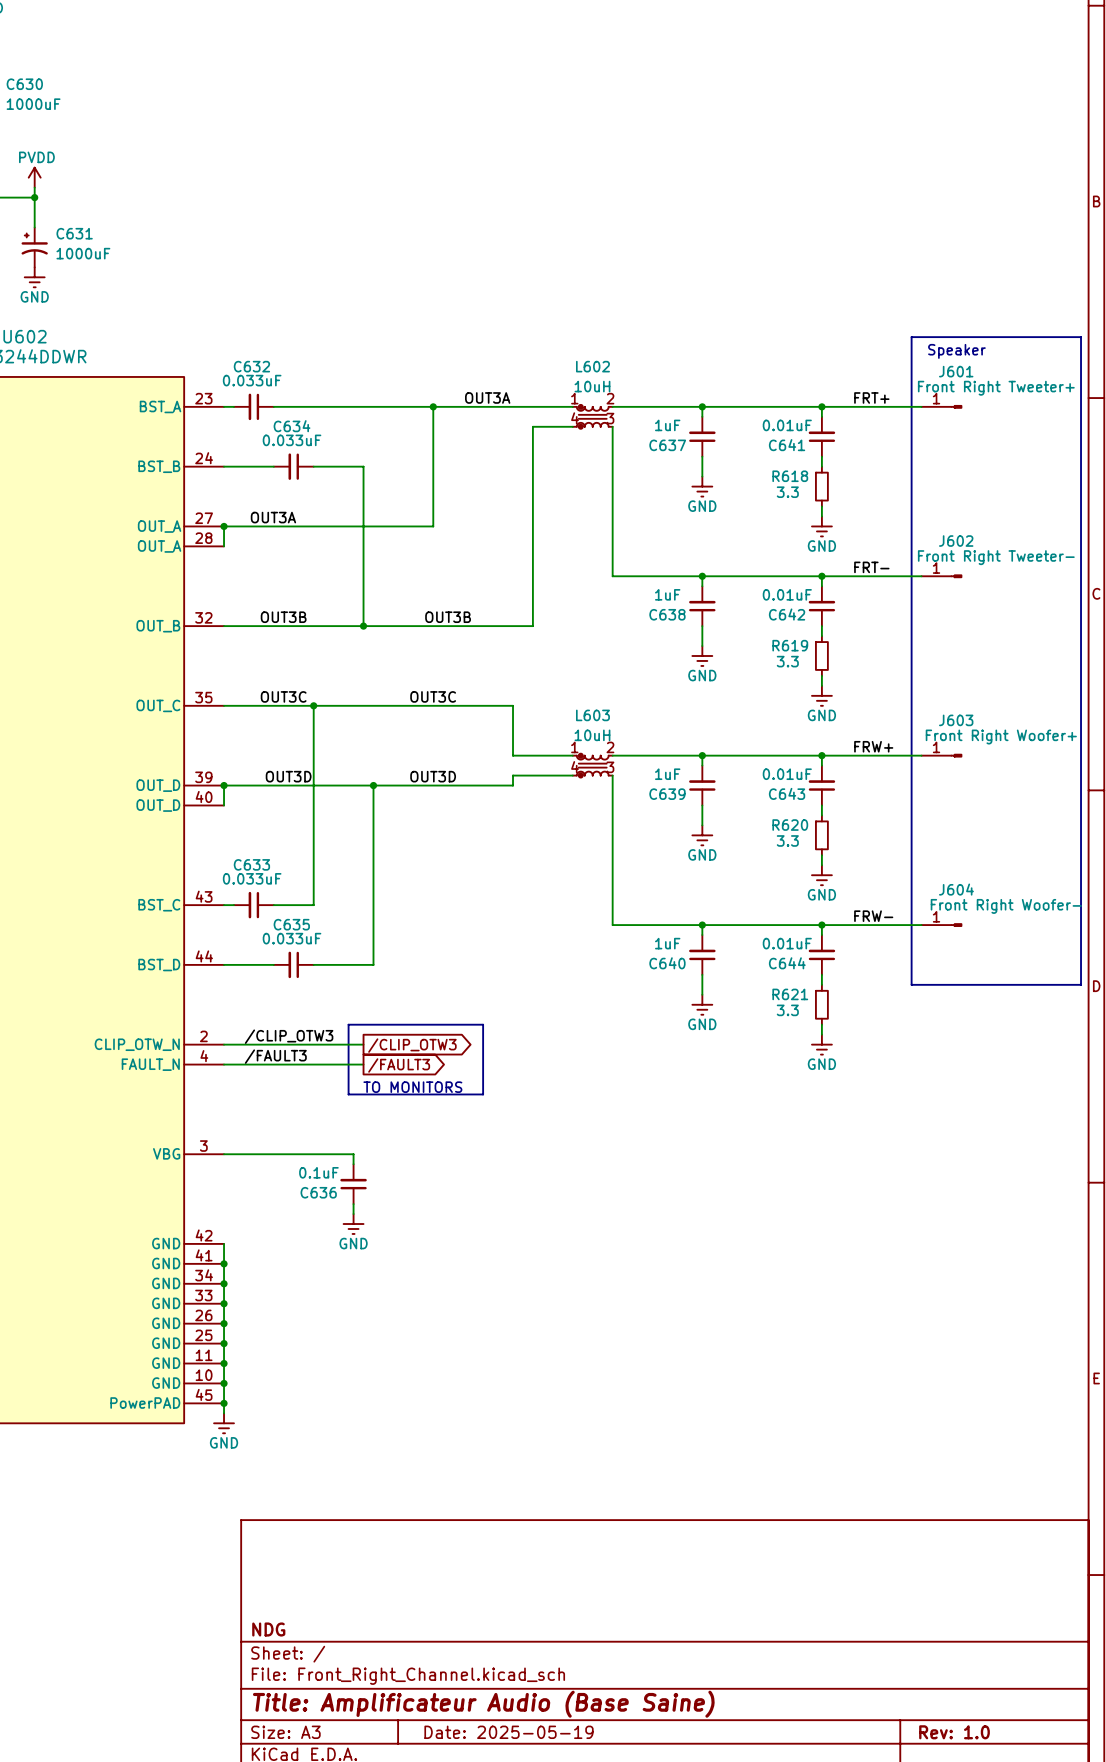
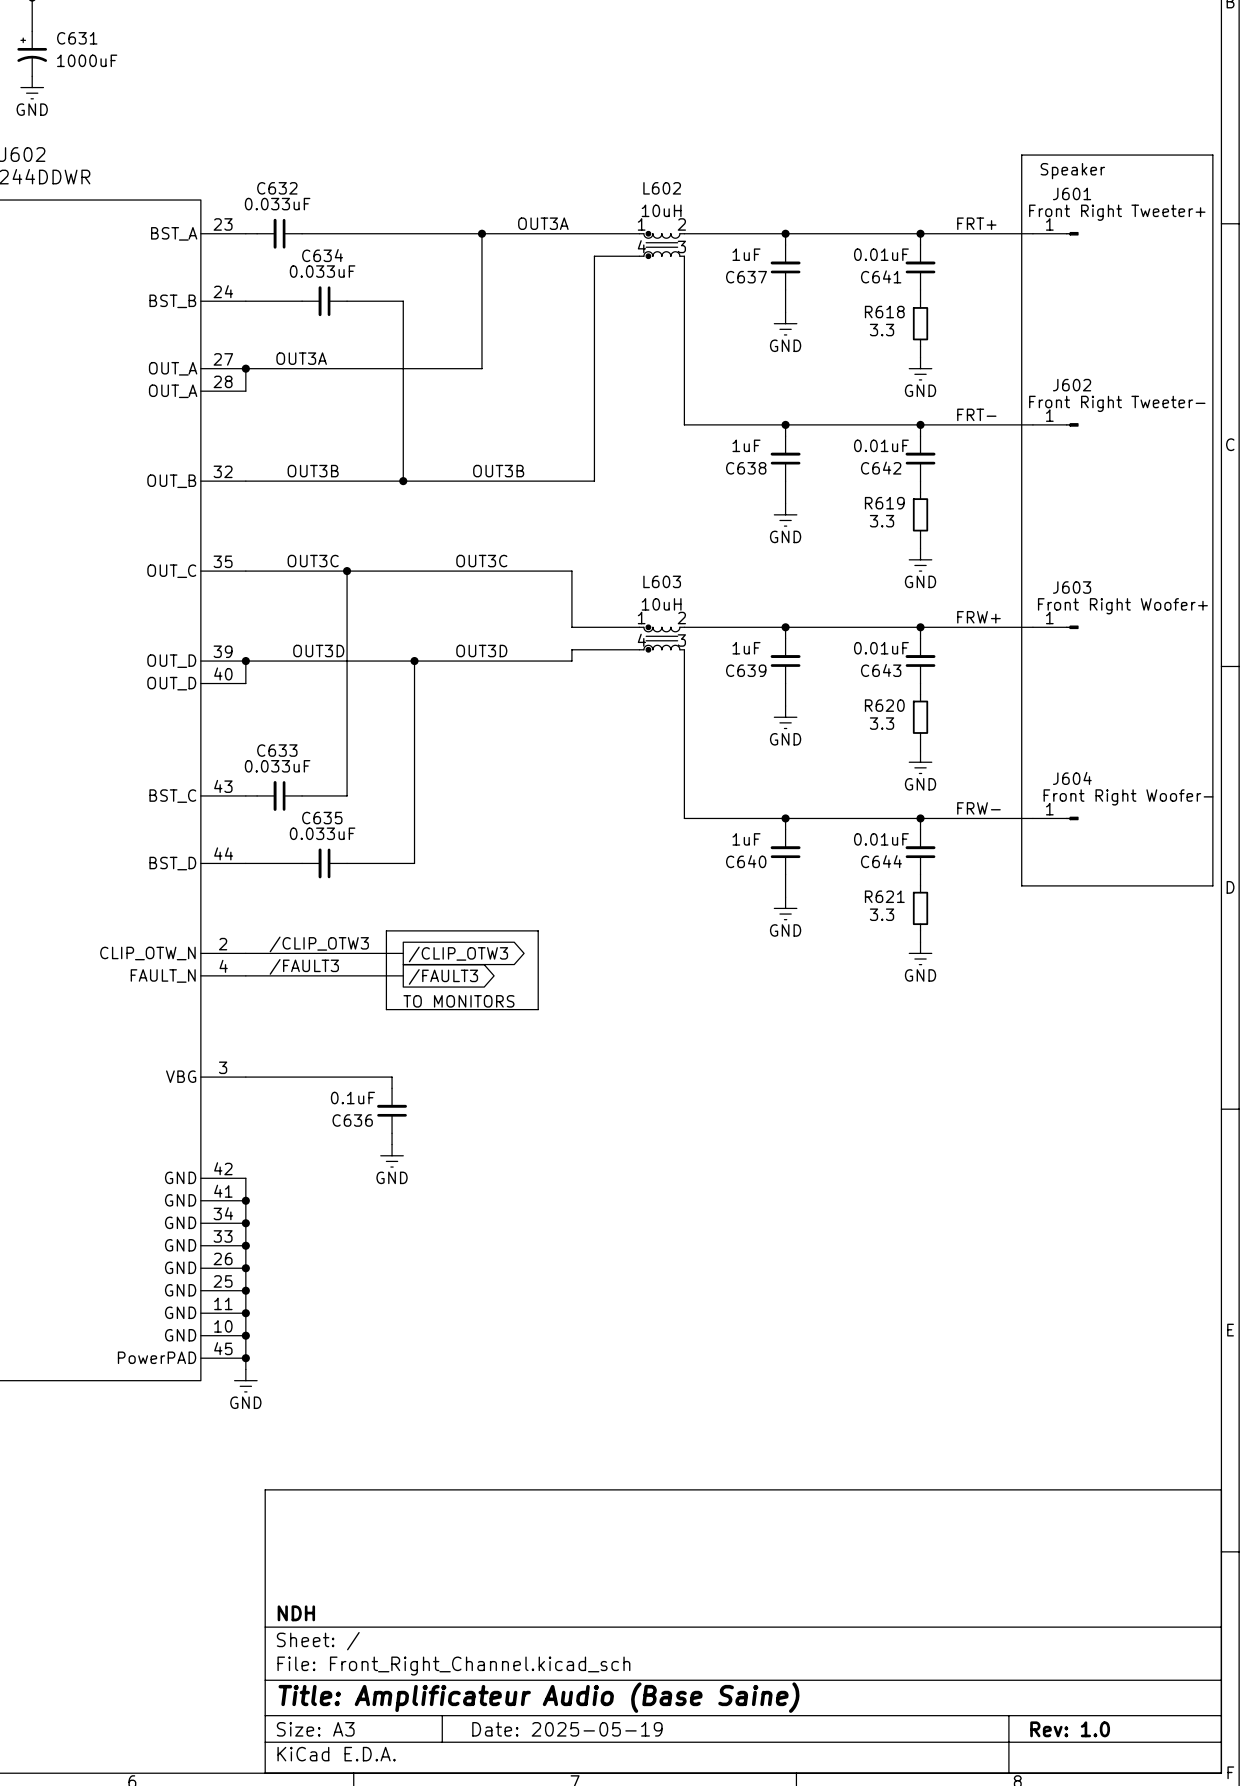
title block: NDG (268, 1629) -> NDH (296, 1613)

